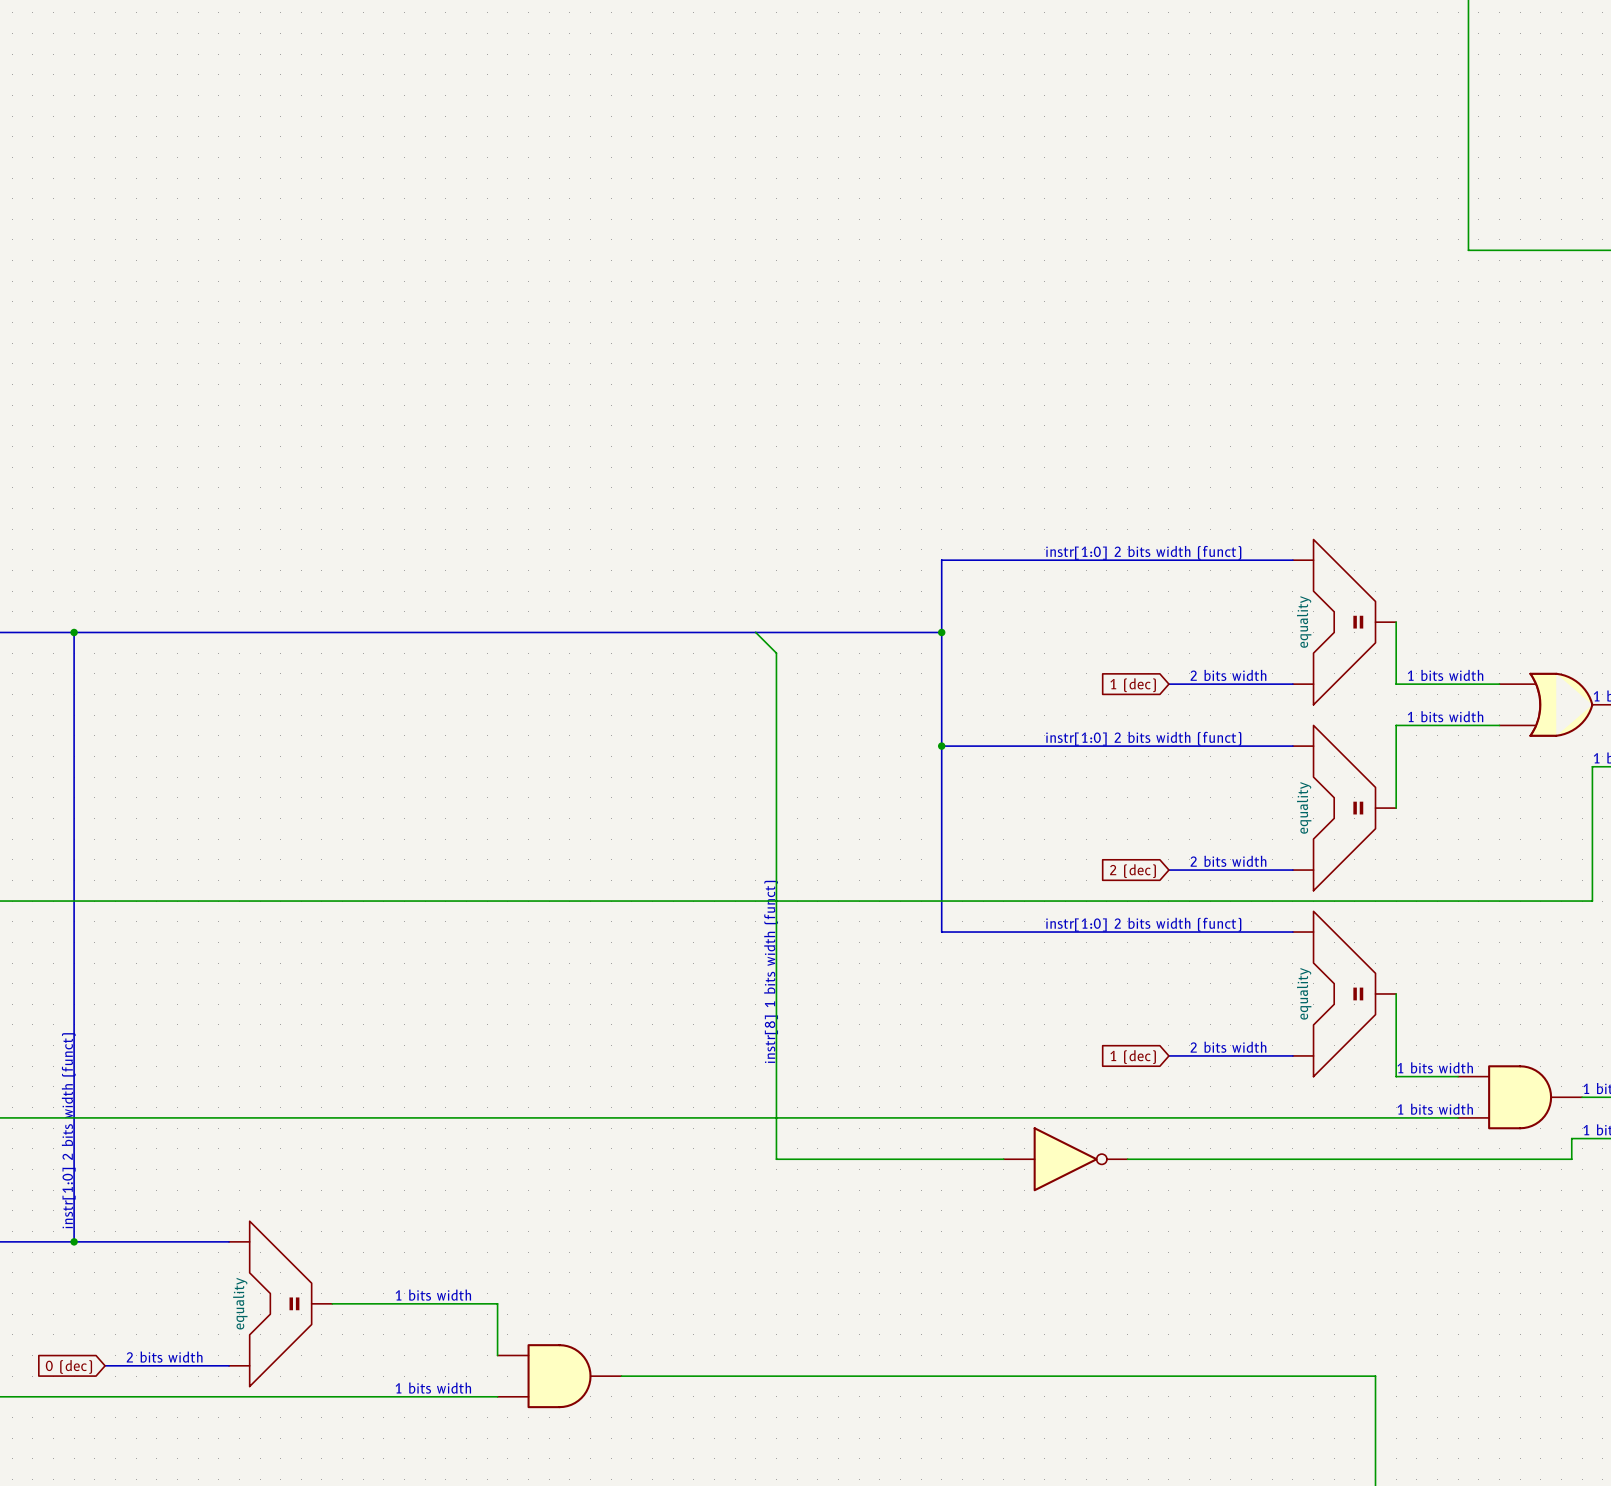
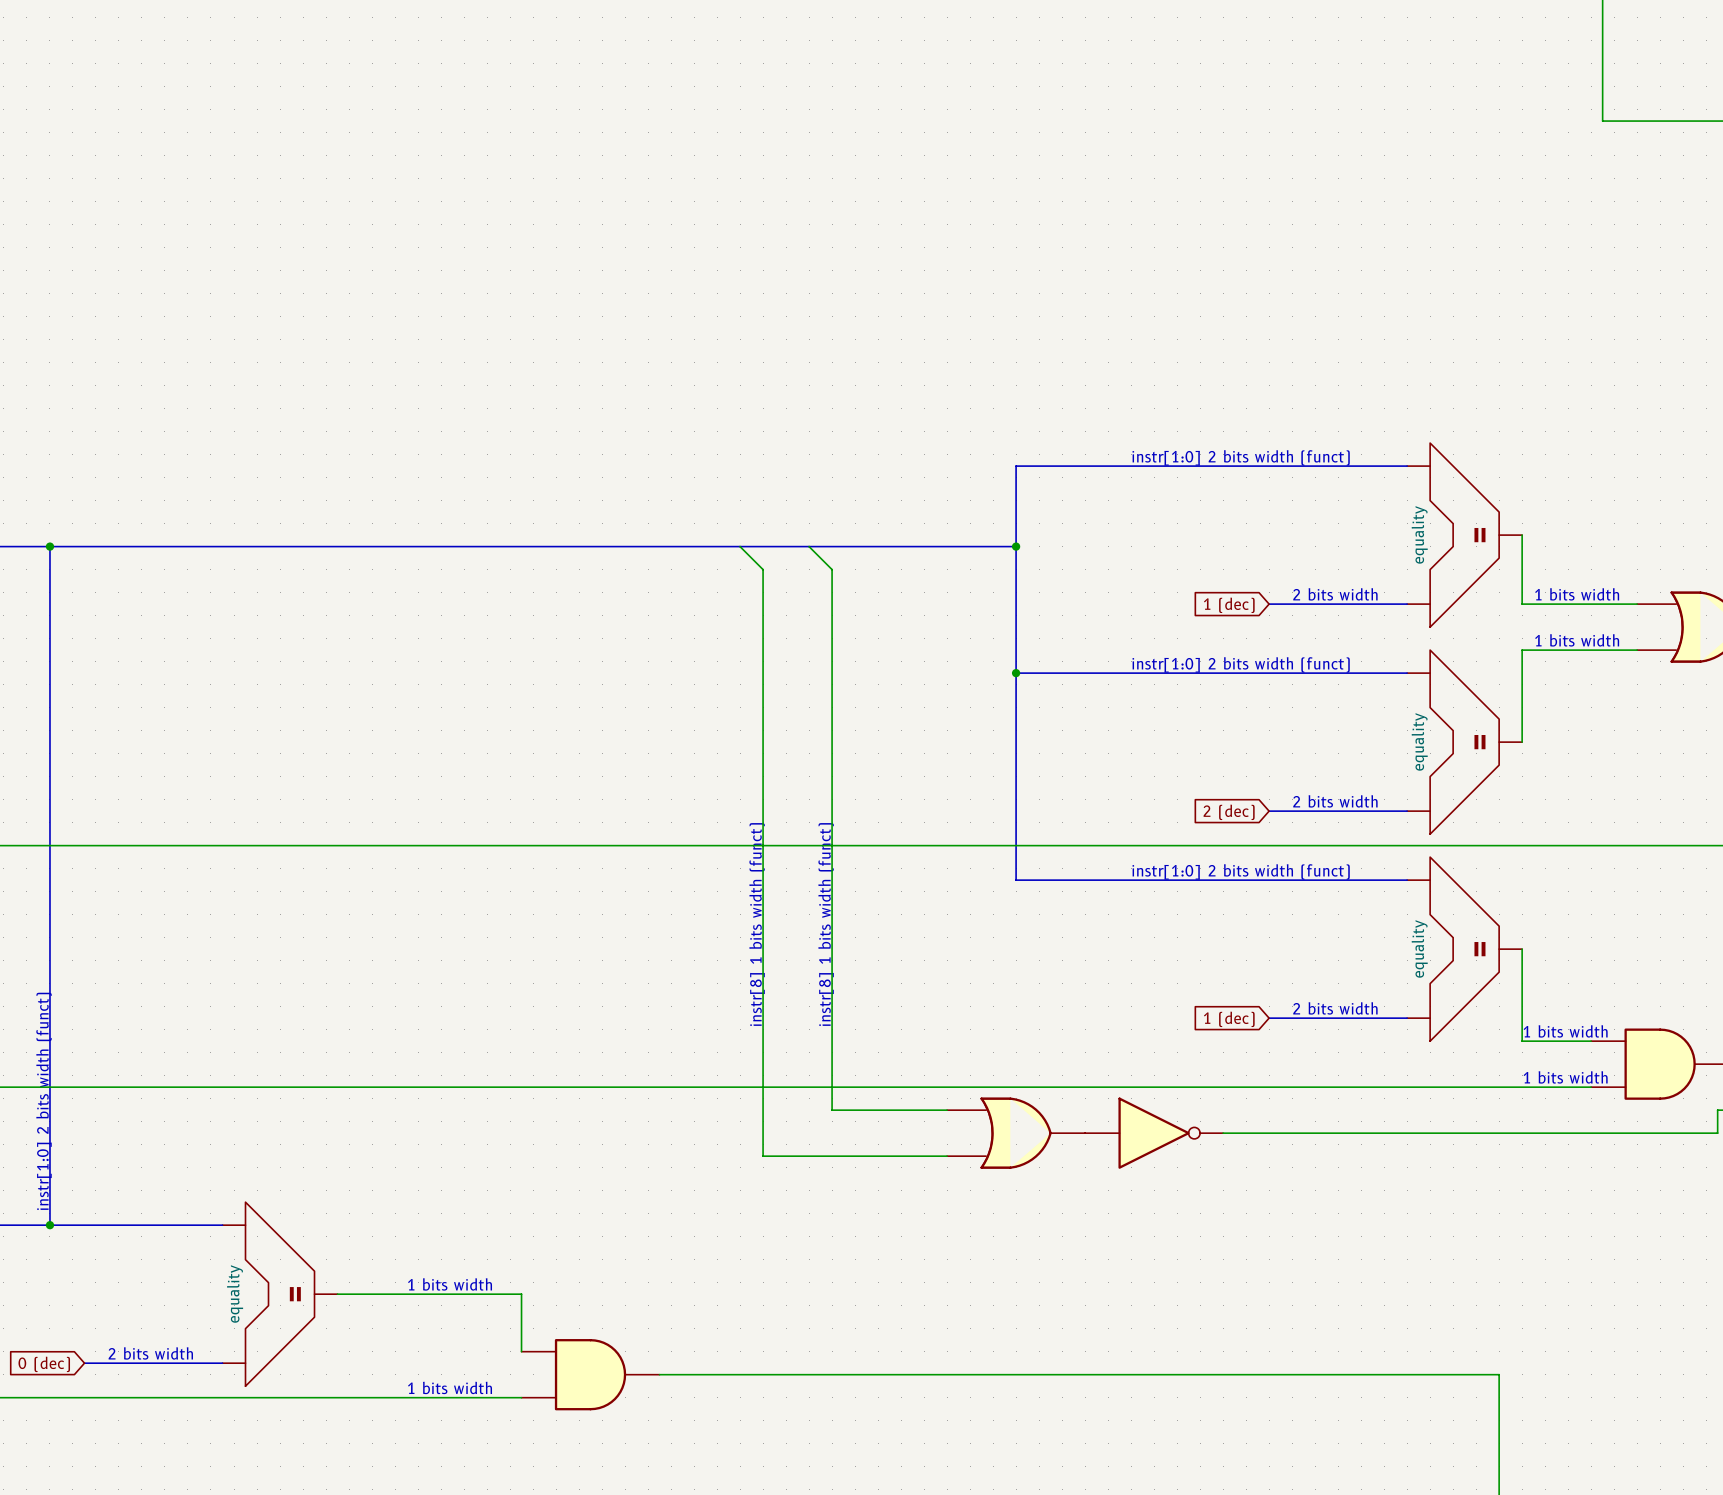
wire: none -> (740, 546) (763, 569) (763, 1156) (947, 1156)
text: none -> instr[8] 1 bits width (funct) (757, 924)
wire: (776, 1138) (776, 1159) (1003, 1159) -> (832, 1110) (947, 1110)
part: none -> (1016, 1133)

